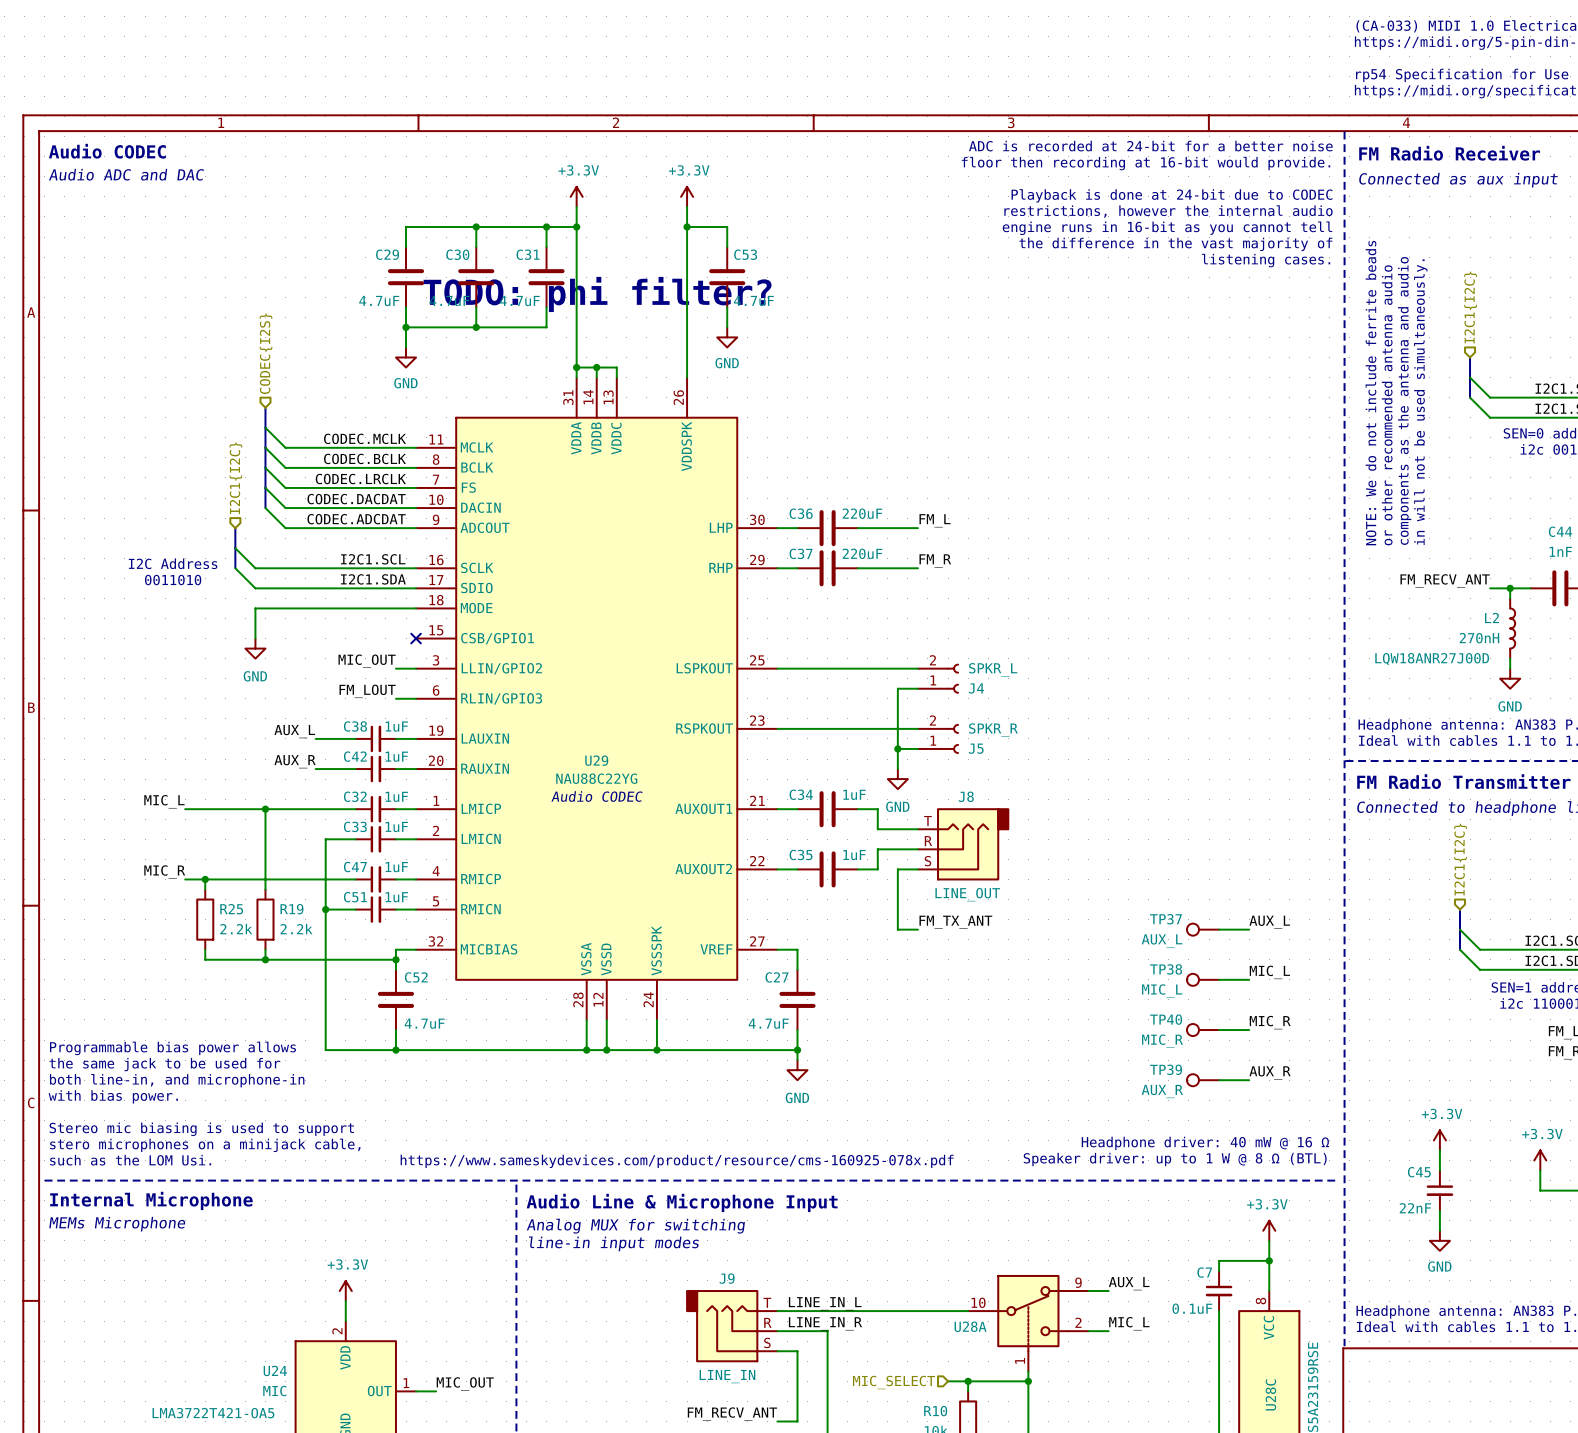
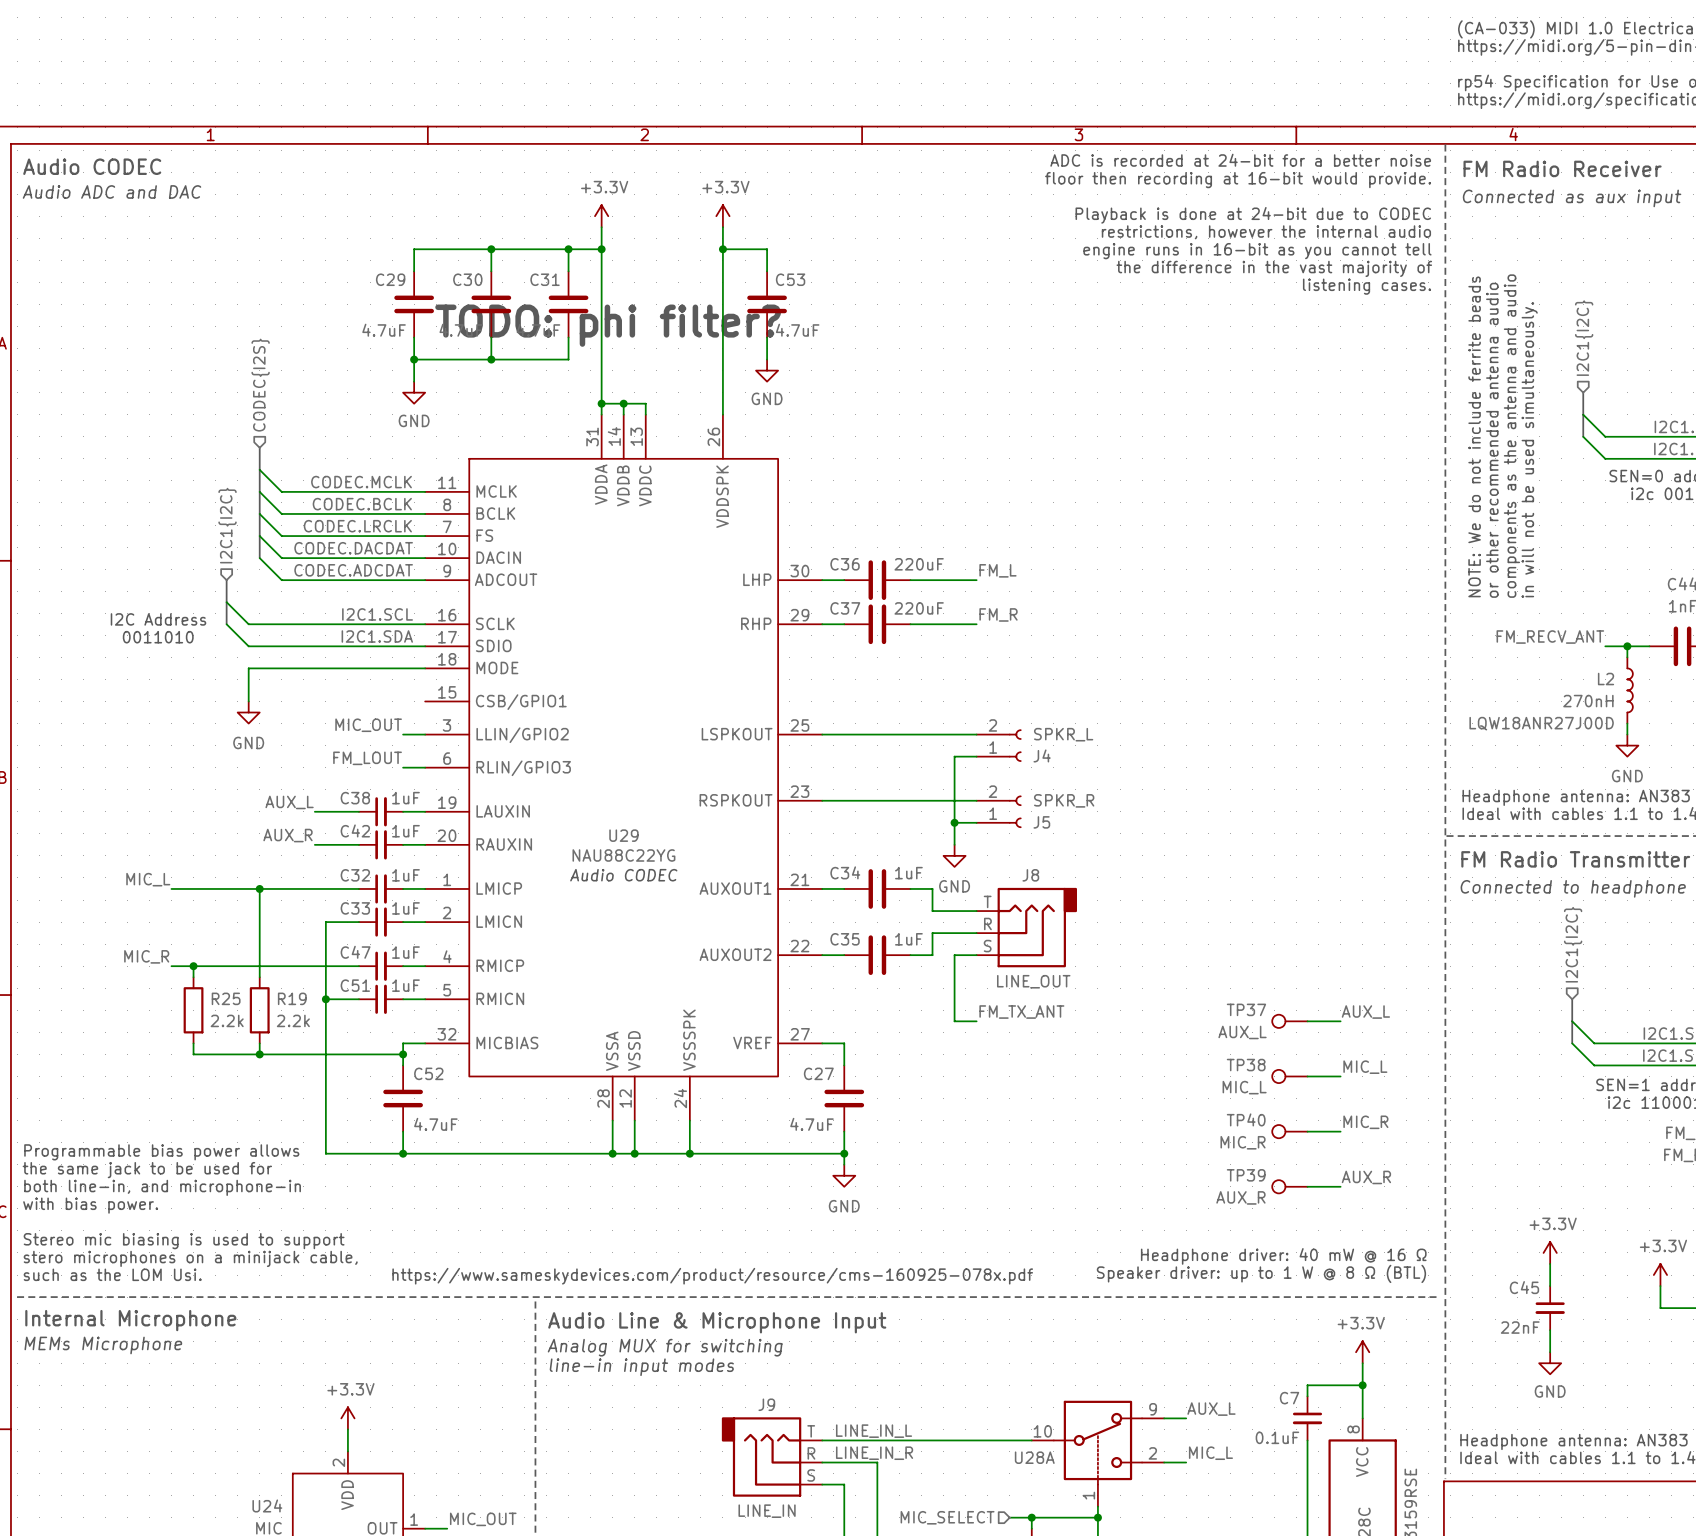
no-connect mark: (416, 638) -> none

